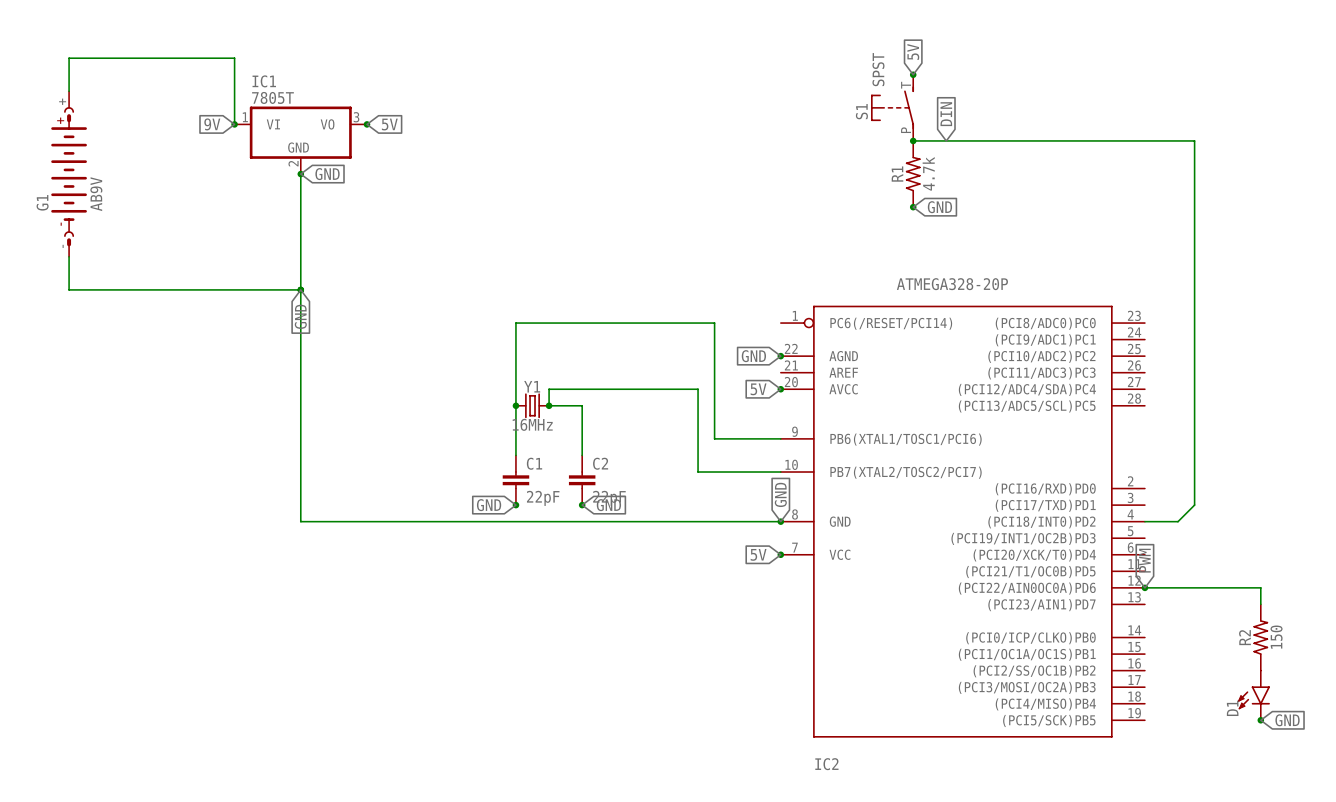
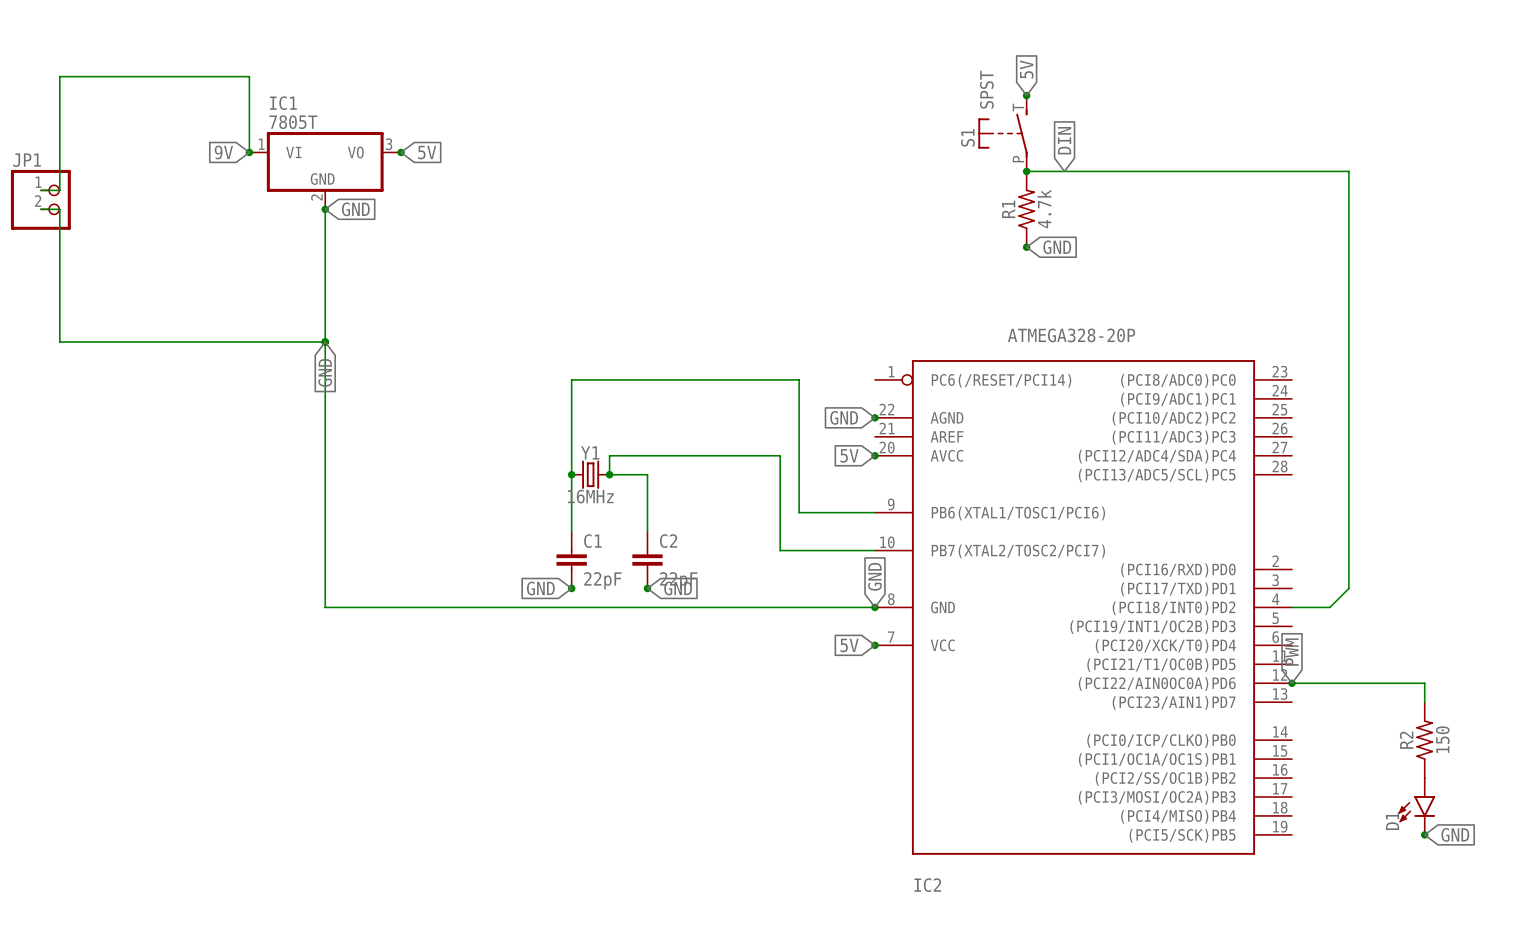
wire: none -> (59, 114) (59, 190) (40, 190)
JP1: none -> (40, 199)
wire: none -> (40, 209) (59, 209) (59, 304)
G1: AB9V (69, 174) -> none

